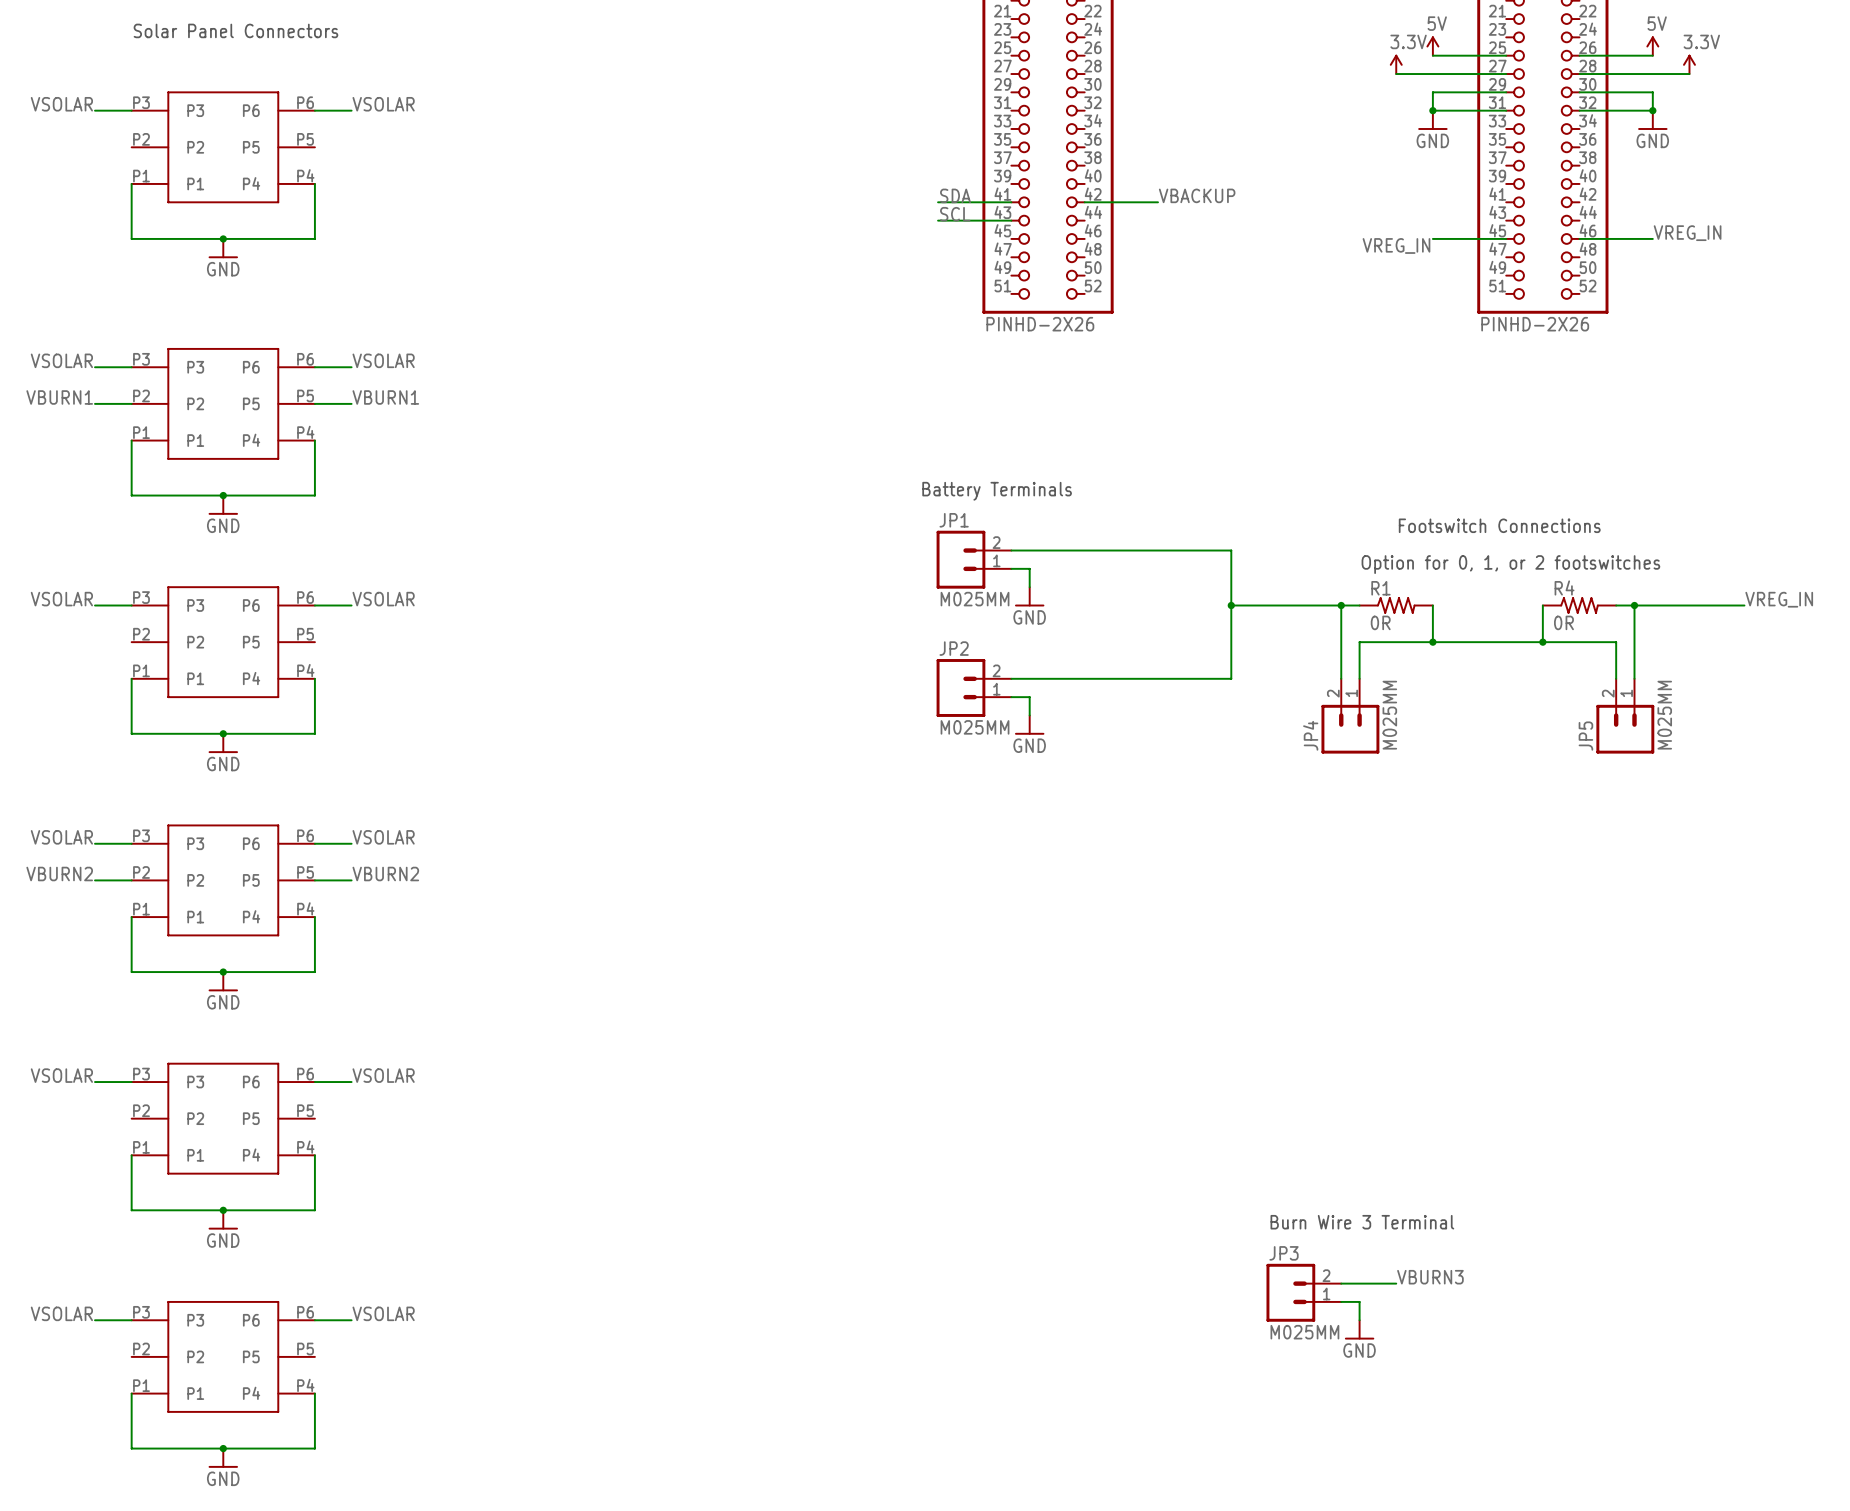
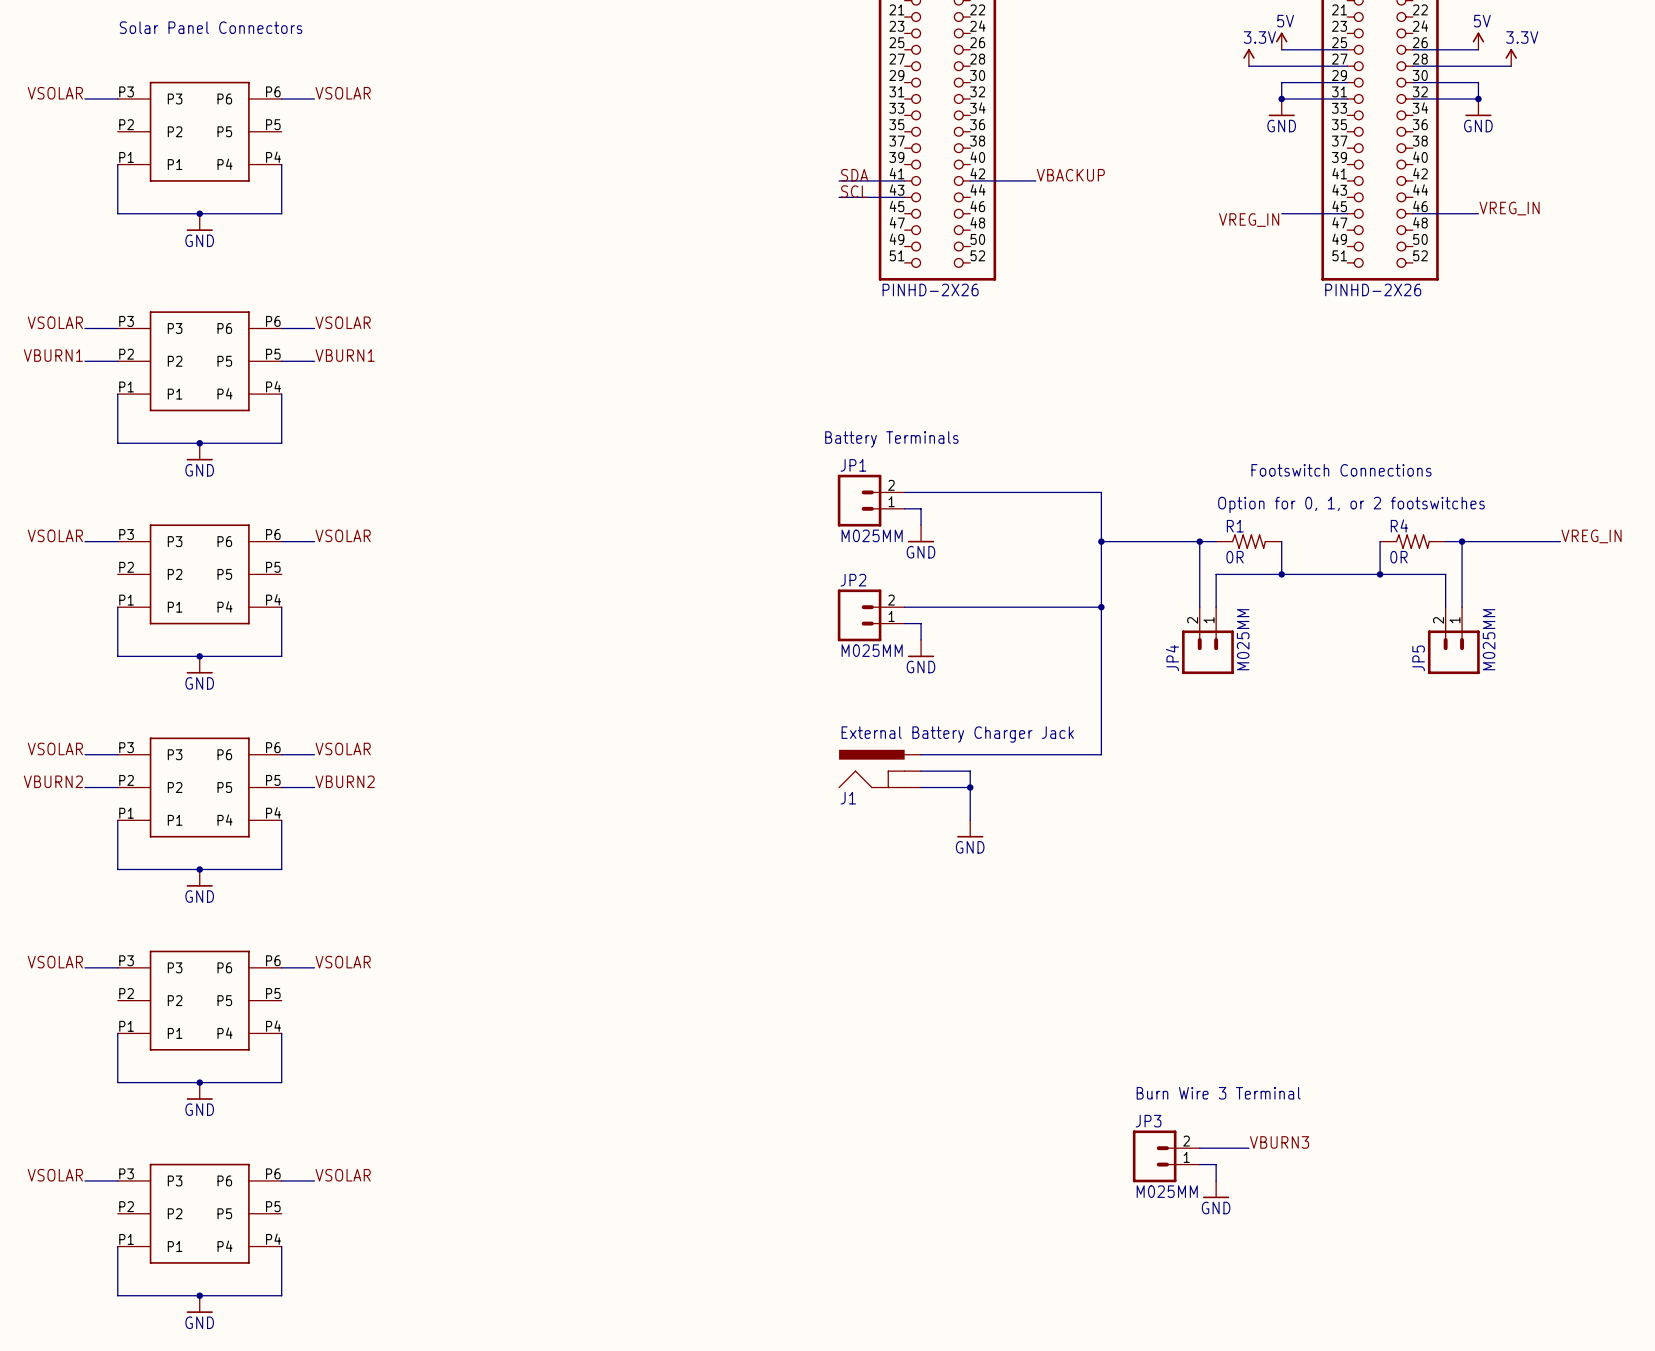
wire: none -> (1101, 607) (1101, 754) (921, 754)
junction: none -> (1101, 607)
text: none -> External Battery Charger Jack (957, 734)
J1: none -> (879, 768)
wire: none -> (921, 771) (970, 771) (970, 820)
wire: none -> (921, 787) (970, 787)
junction: none -> (970, 787)
power symbol: none -> GND (970, 828)

